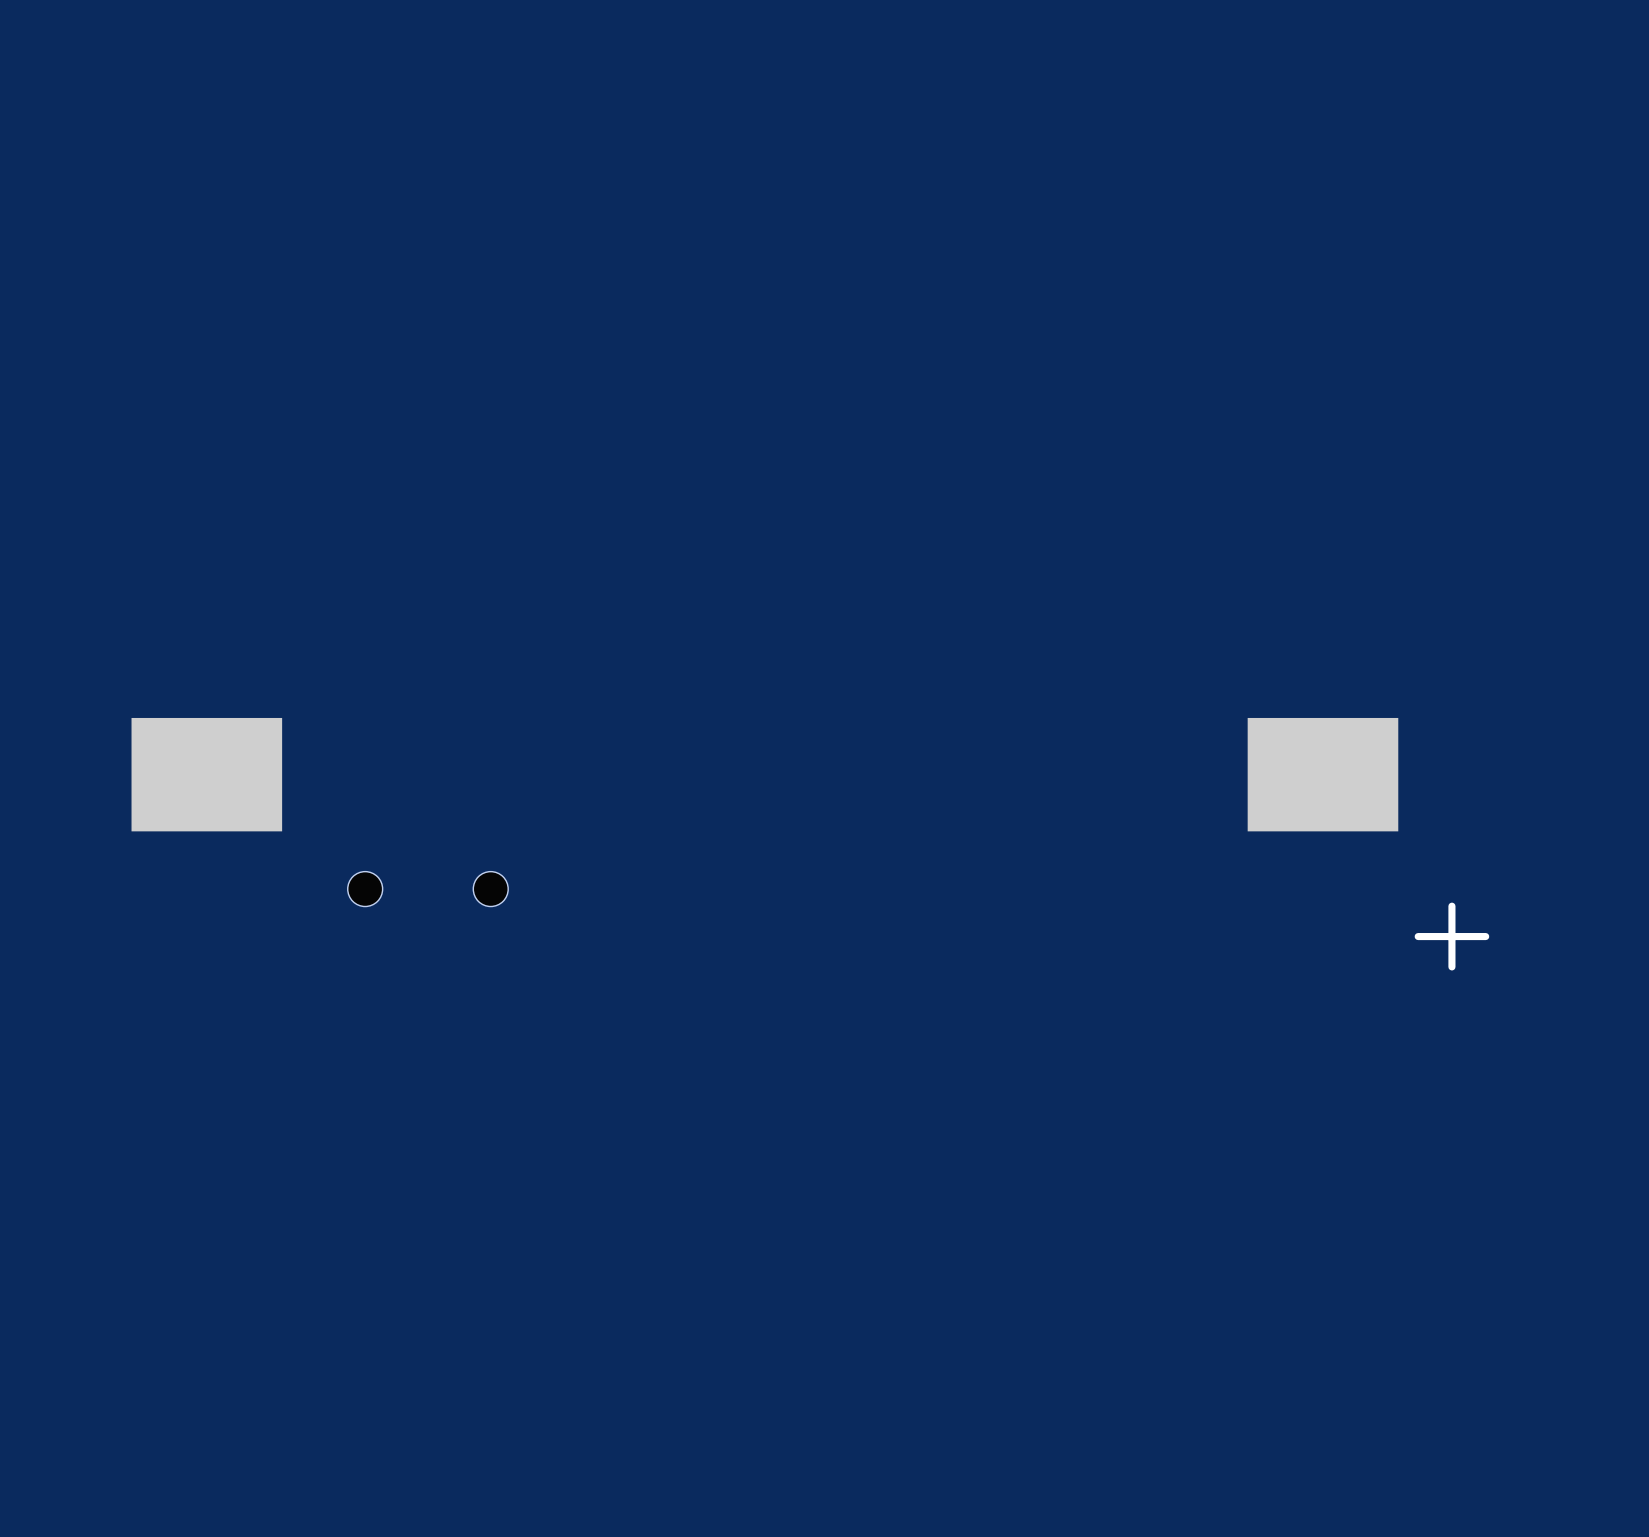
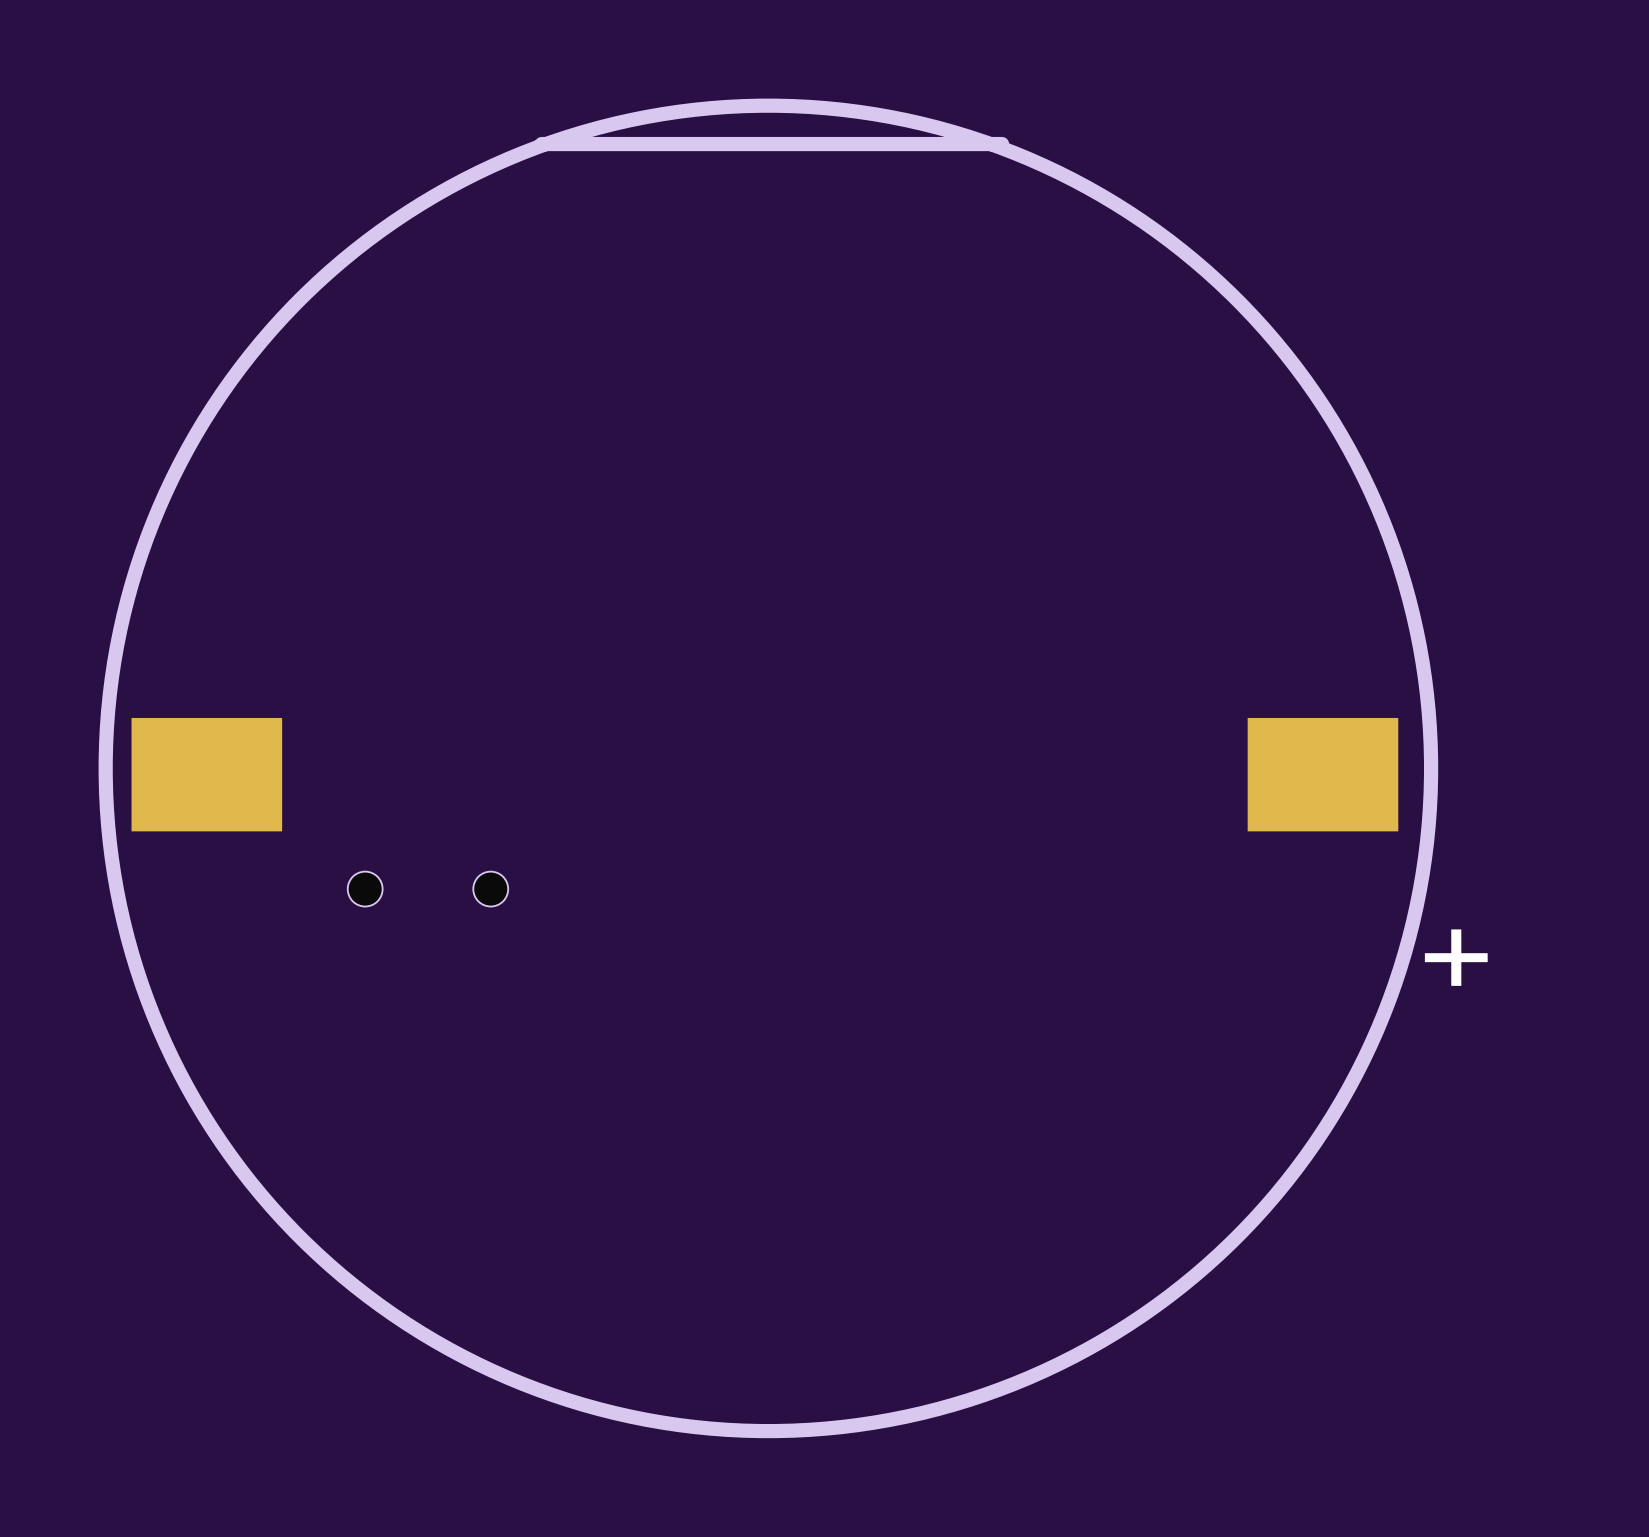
round board edge: none -> [98, 98, 1439, 1439]
board edge: none -> (1002, 144) (541, 144)

